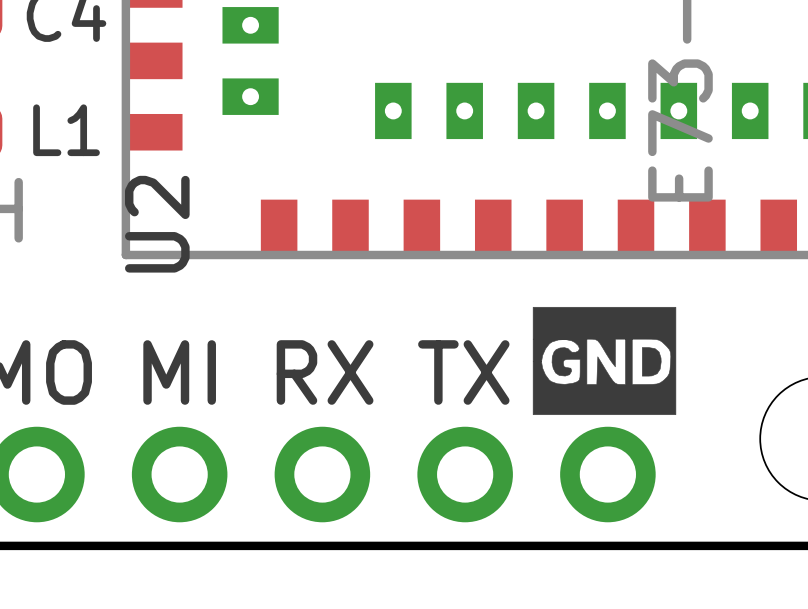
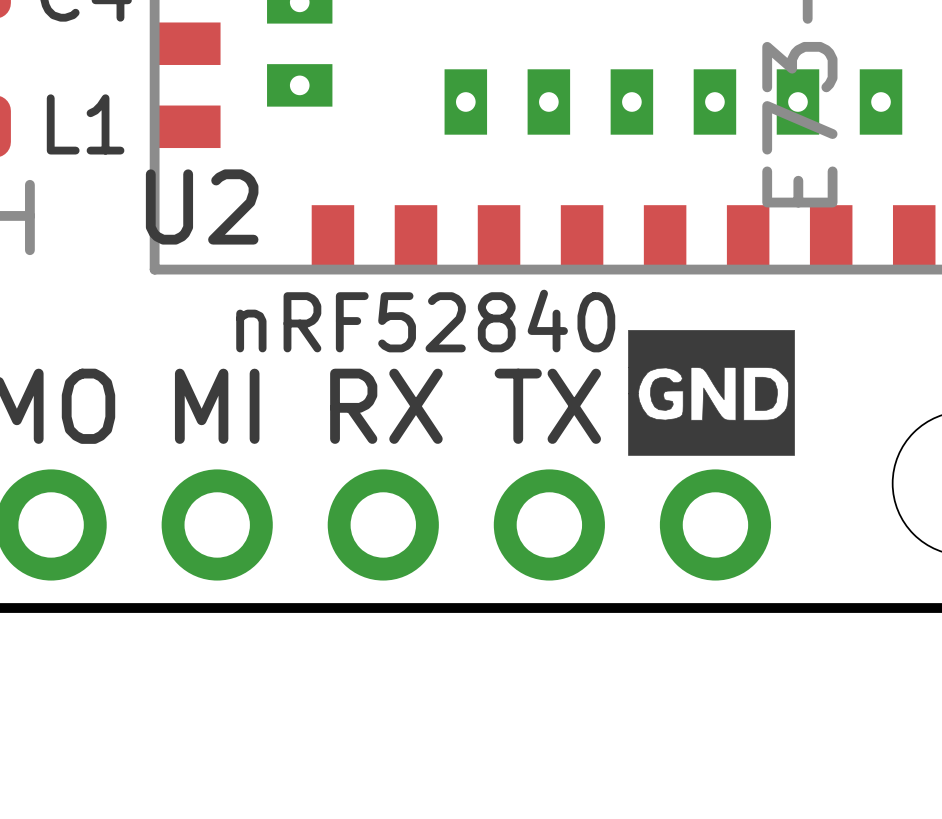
U2 name rotation: 0° (157, 224) -> 90° clockwise (202, 206)
text: none -> nRF52840 (425, 321)

